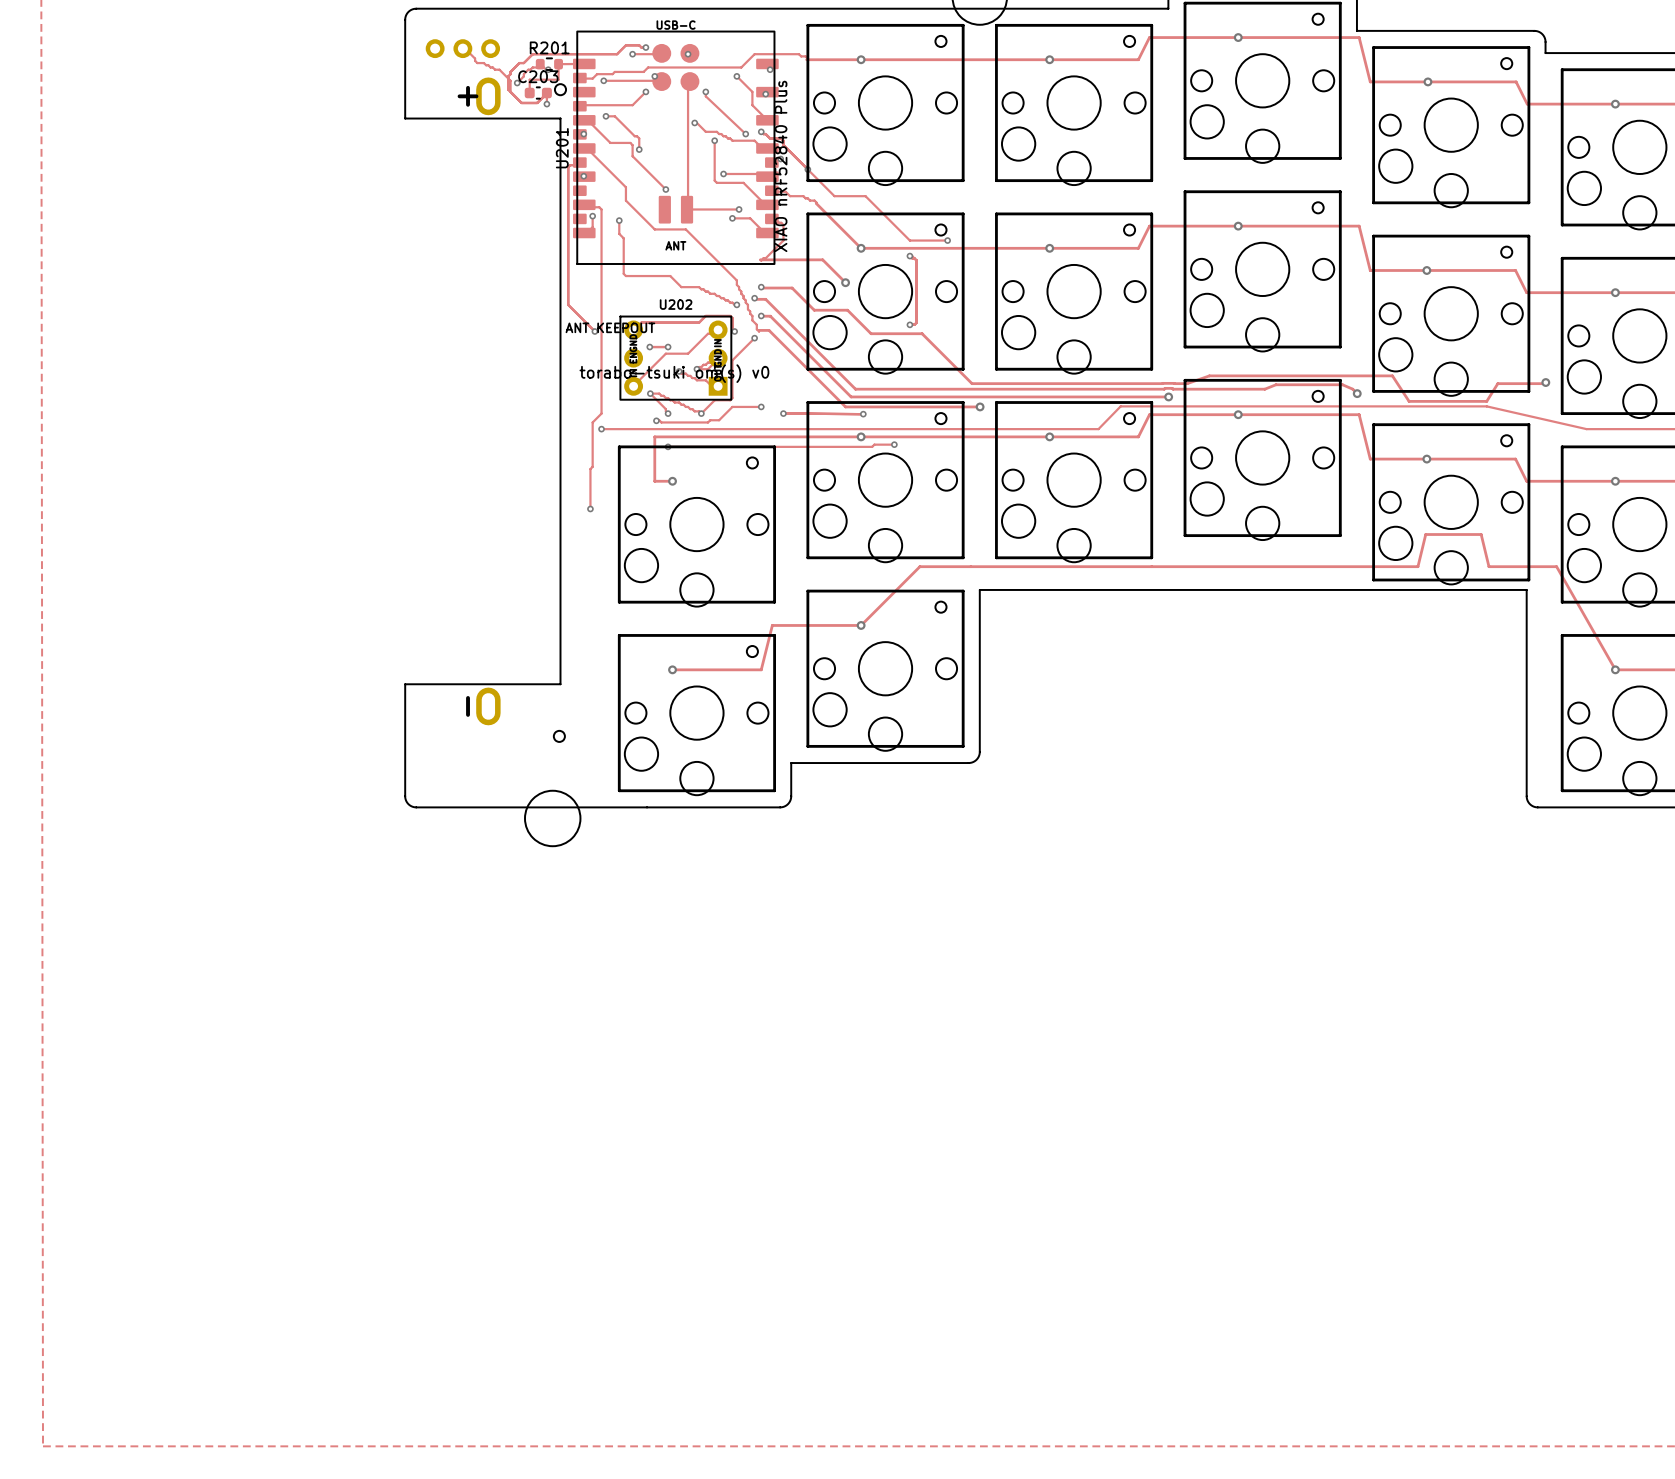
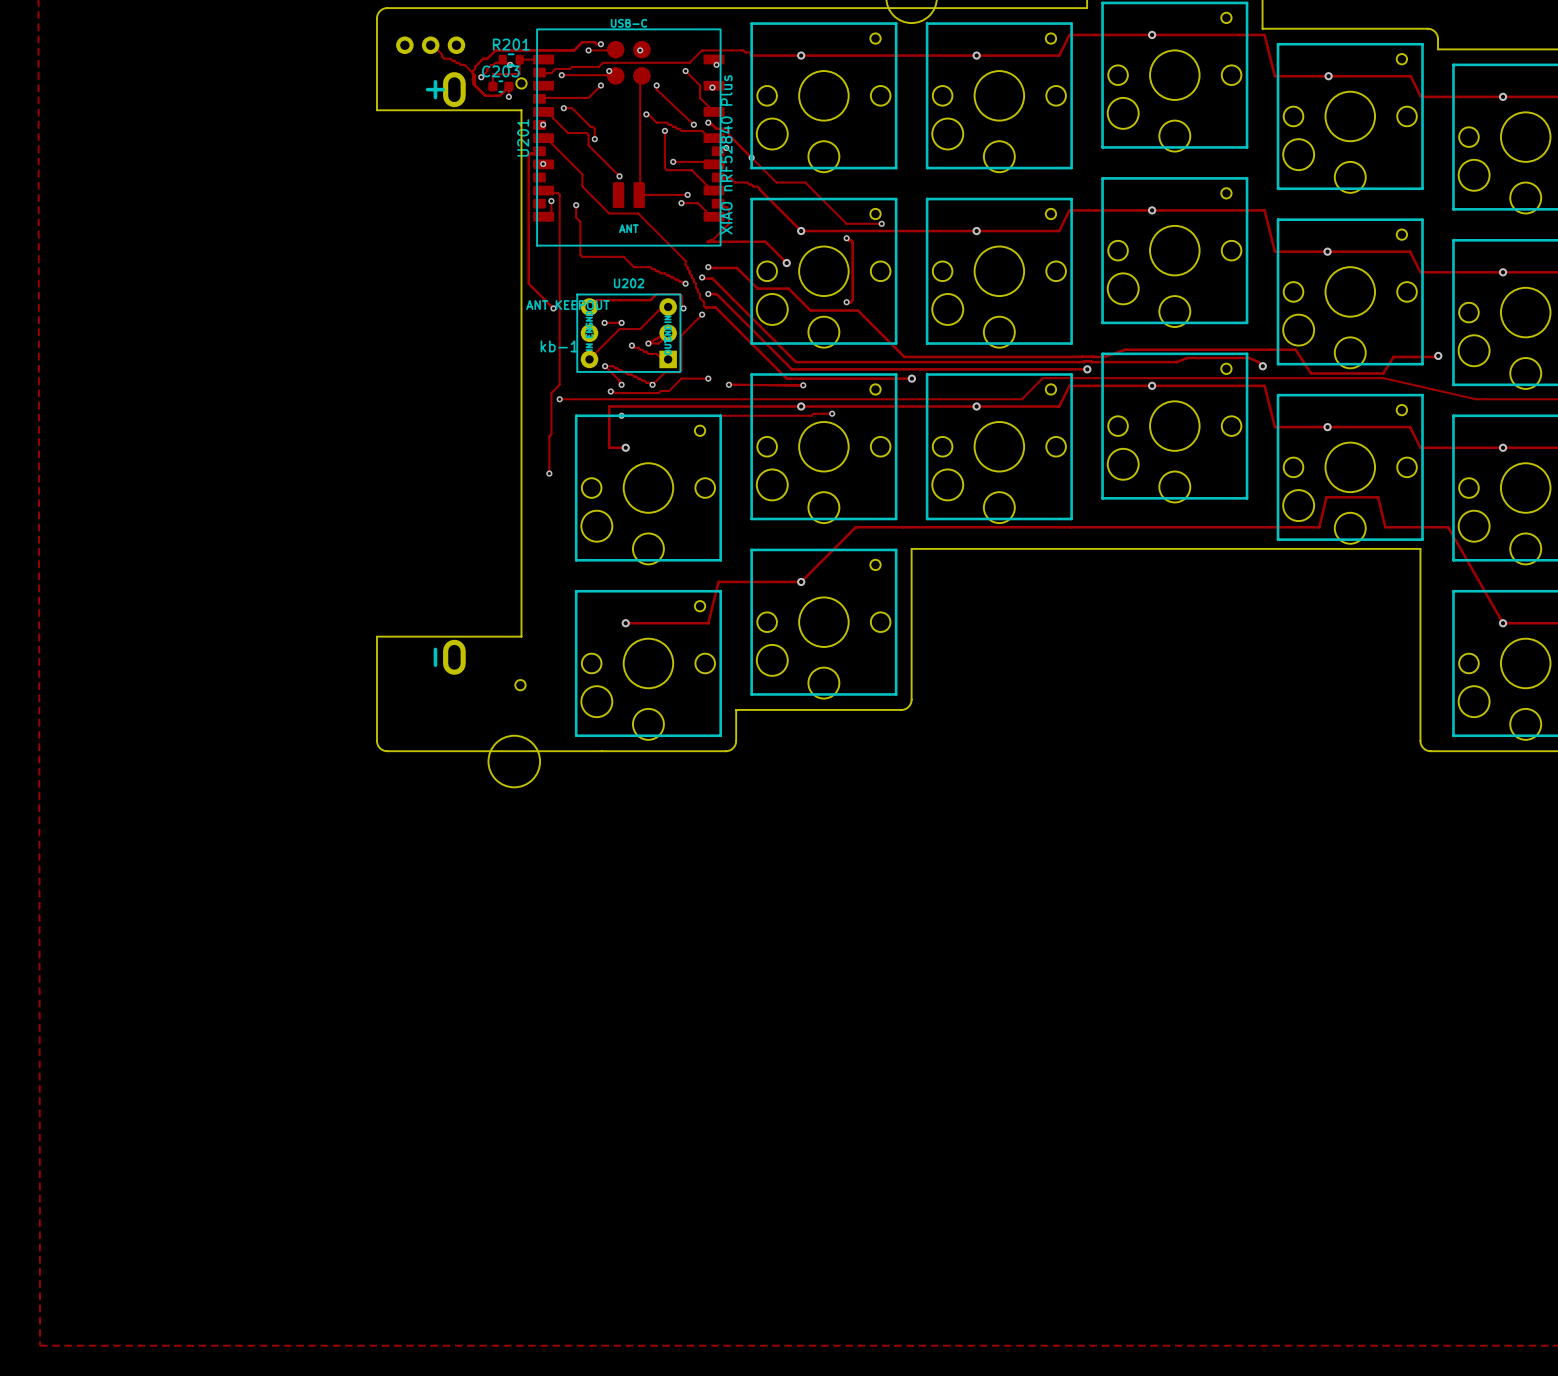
text: torabo-tsuki om(s) v0 (674, 373) -> kb-1 (559, 346)

